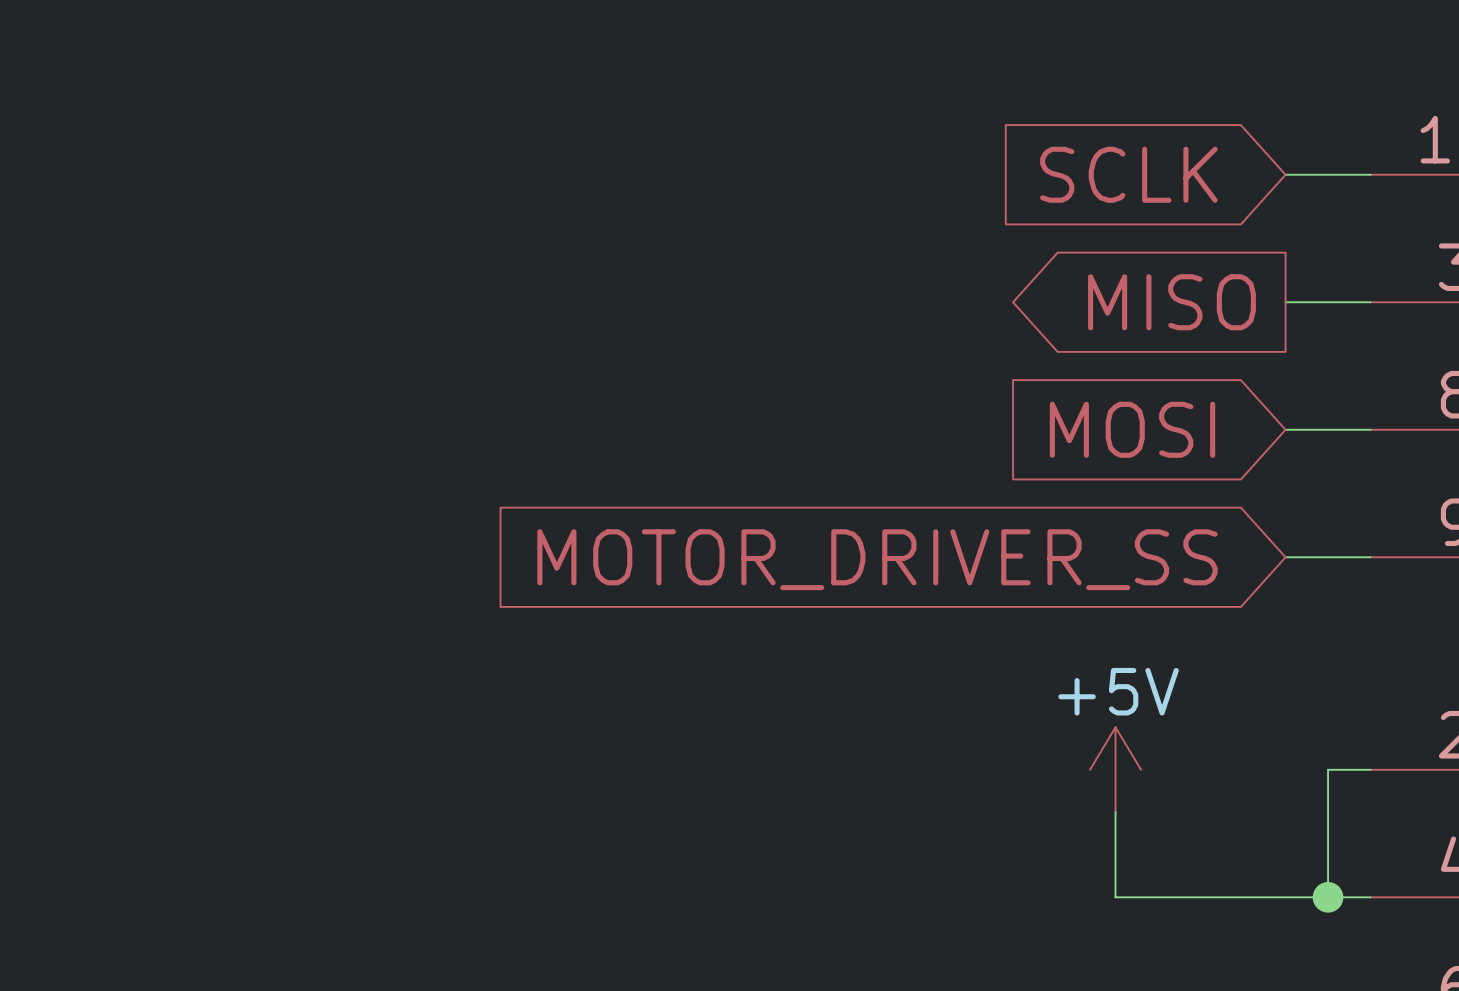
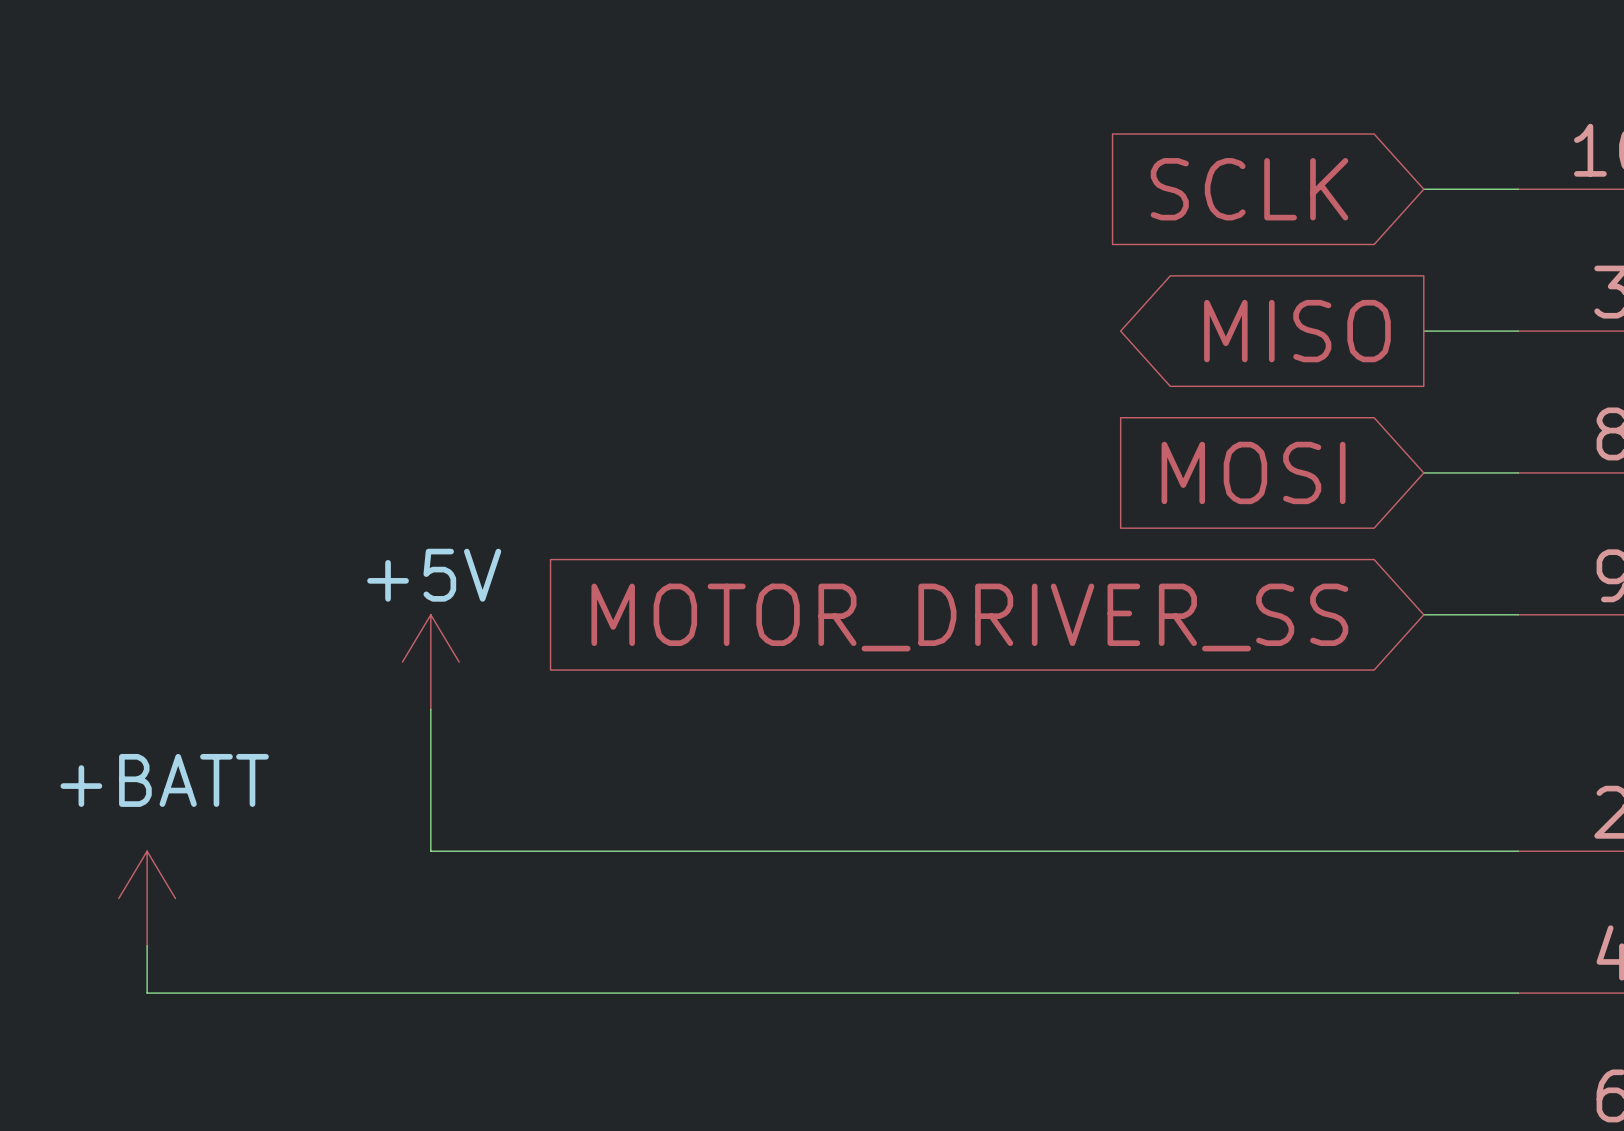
power symbol position: +5V (1115, 769) -> +5V (430, 662)
wire: (1328, 769) (1328, 897) -> (1471, 851) (430, 851) (430, 709)
power symbol: none -> +BATT (147, 898)
wire: (1115, 812) (1115, 897) -> (147, 945) (147, 993) (1234, 993)
junction: (1328, 897) -> none

